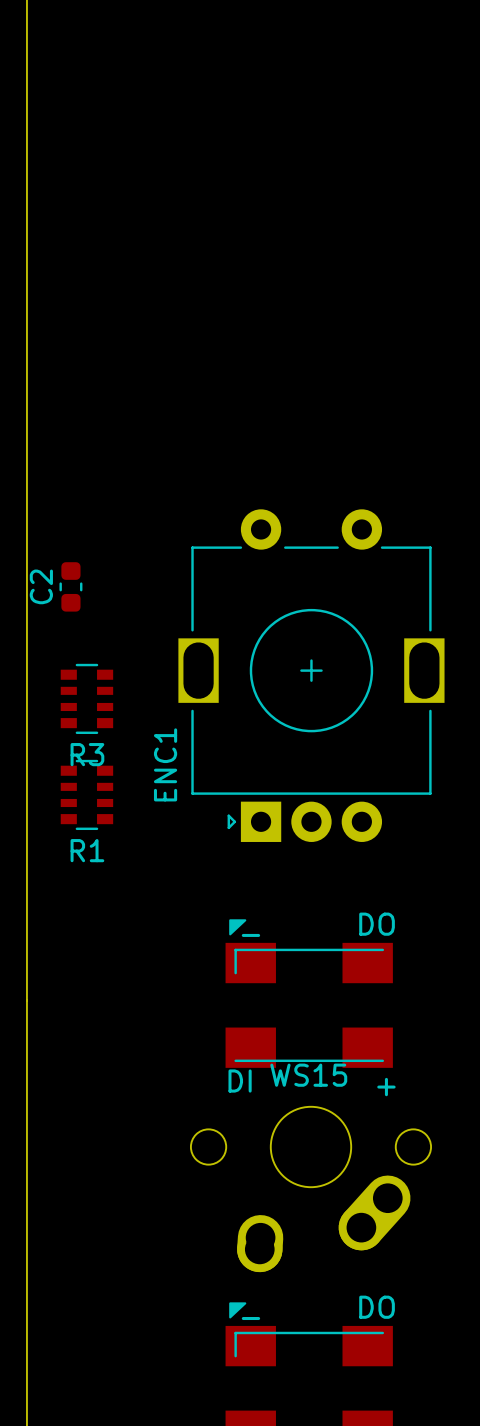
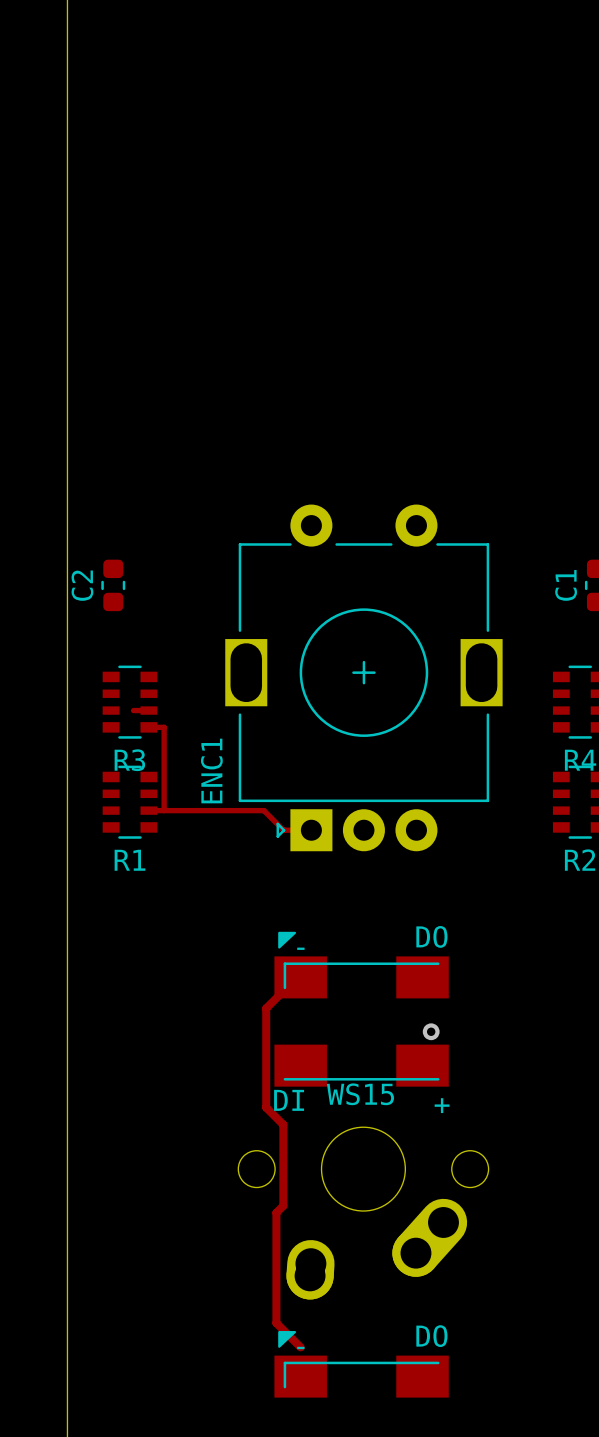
track: none -> (133, 710) (148, 710)
track: none -> (148, 727) (164, 727) (164, 810)
track: none -> (148, 810) (263, 810) (283, 830) (311, 830)
track: none -> (300, 973) (266, 1008) (266, 1107) (283, 1124) (283, 1205) (276, 1212) (276, 1323) (300, 1347)
via: none -> (431, 1031)

